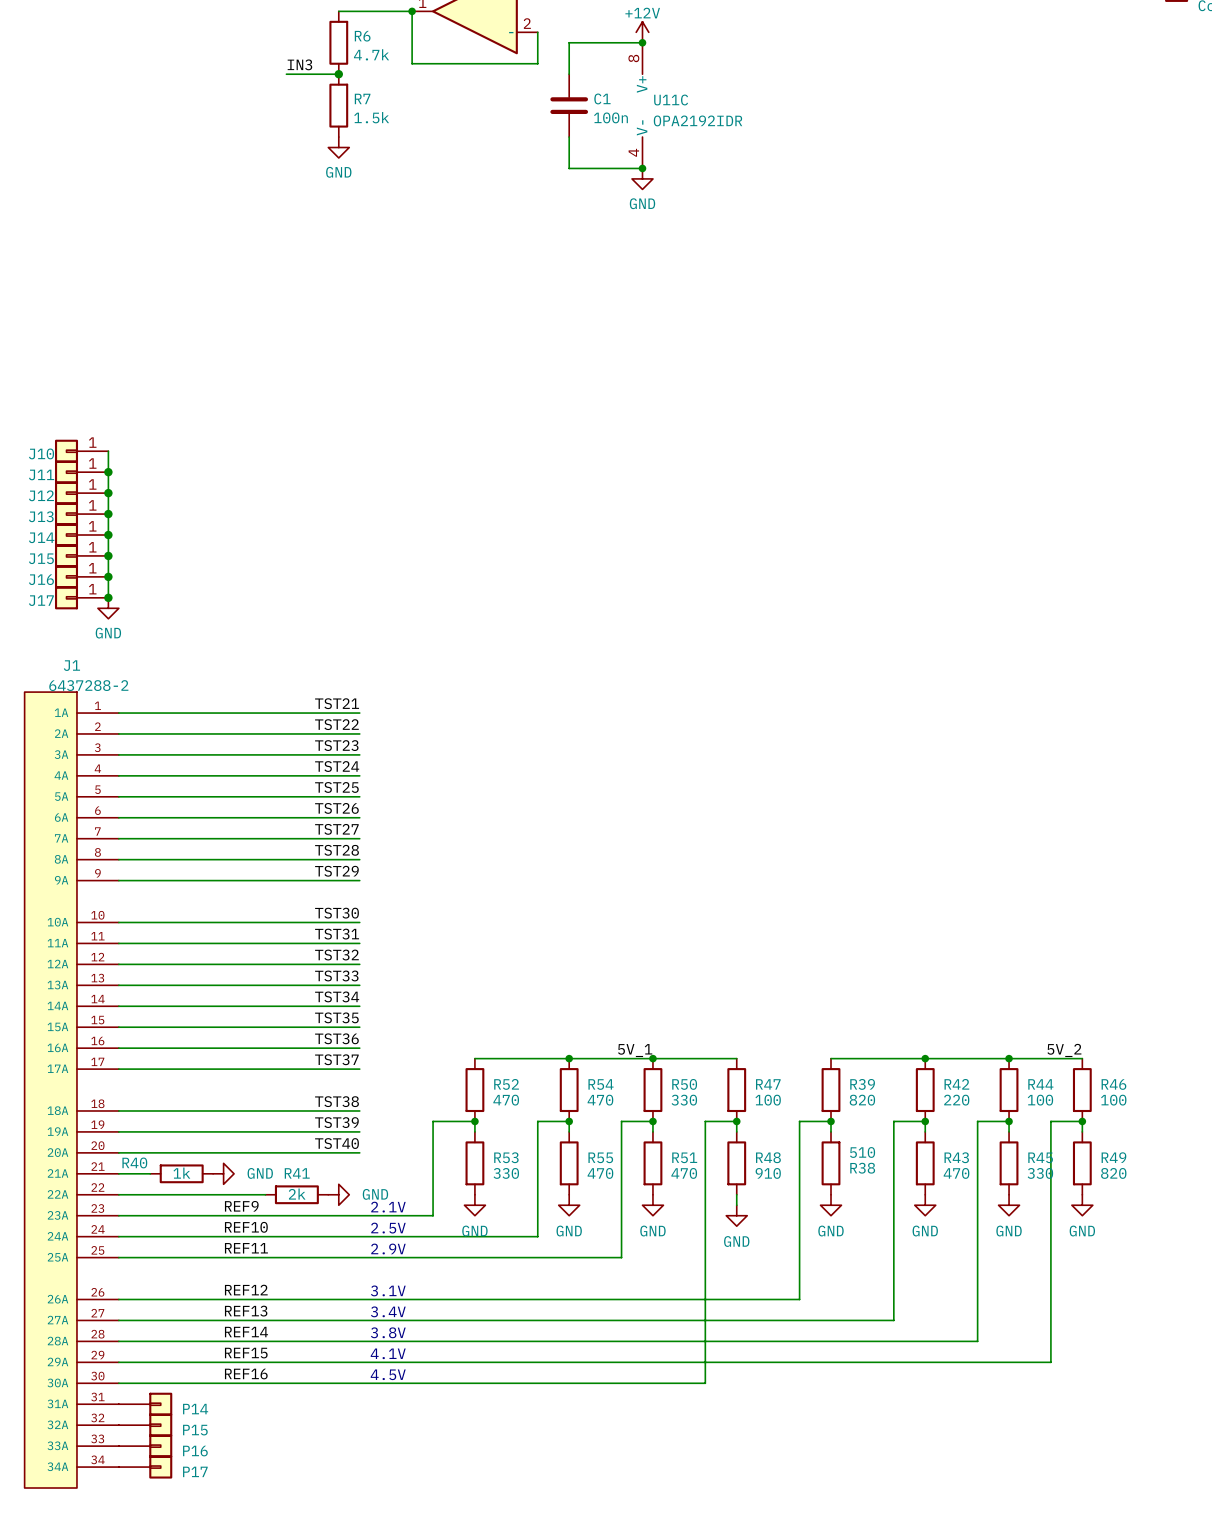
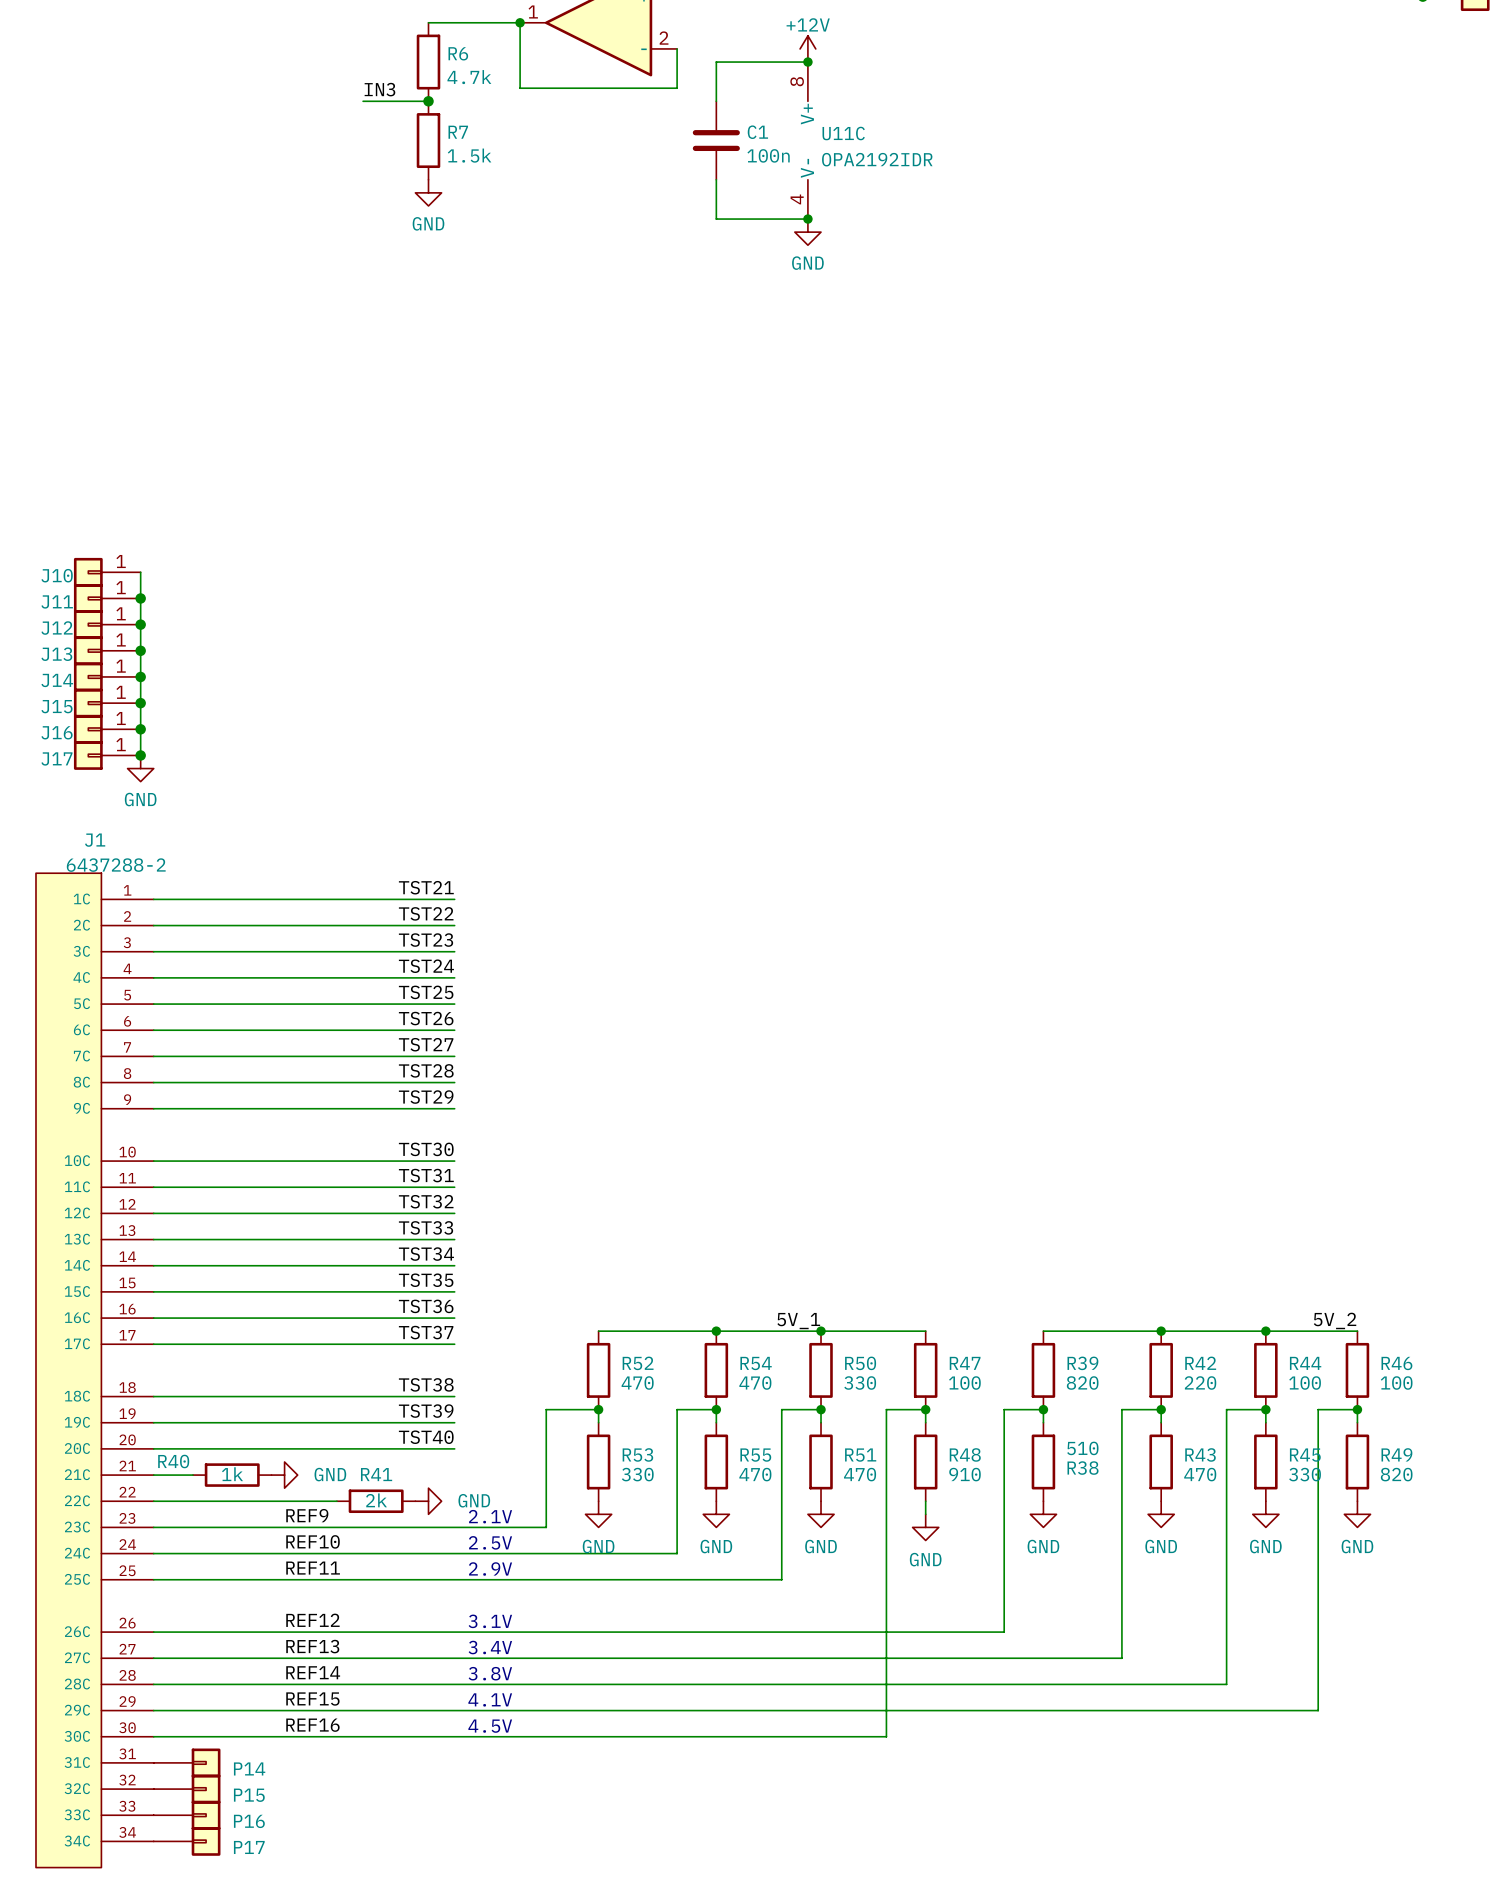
J1 symbol: [24, 692, 119, 1489] -> [35, 873, 154, 1868]

